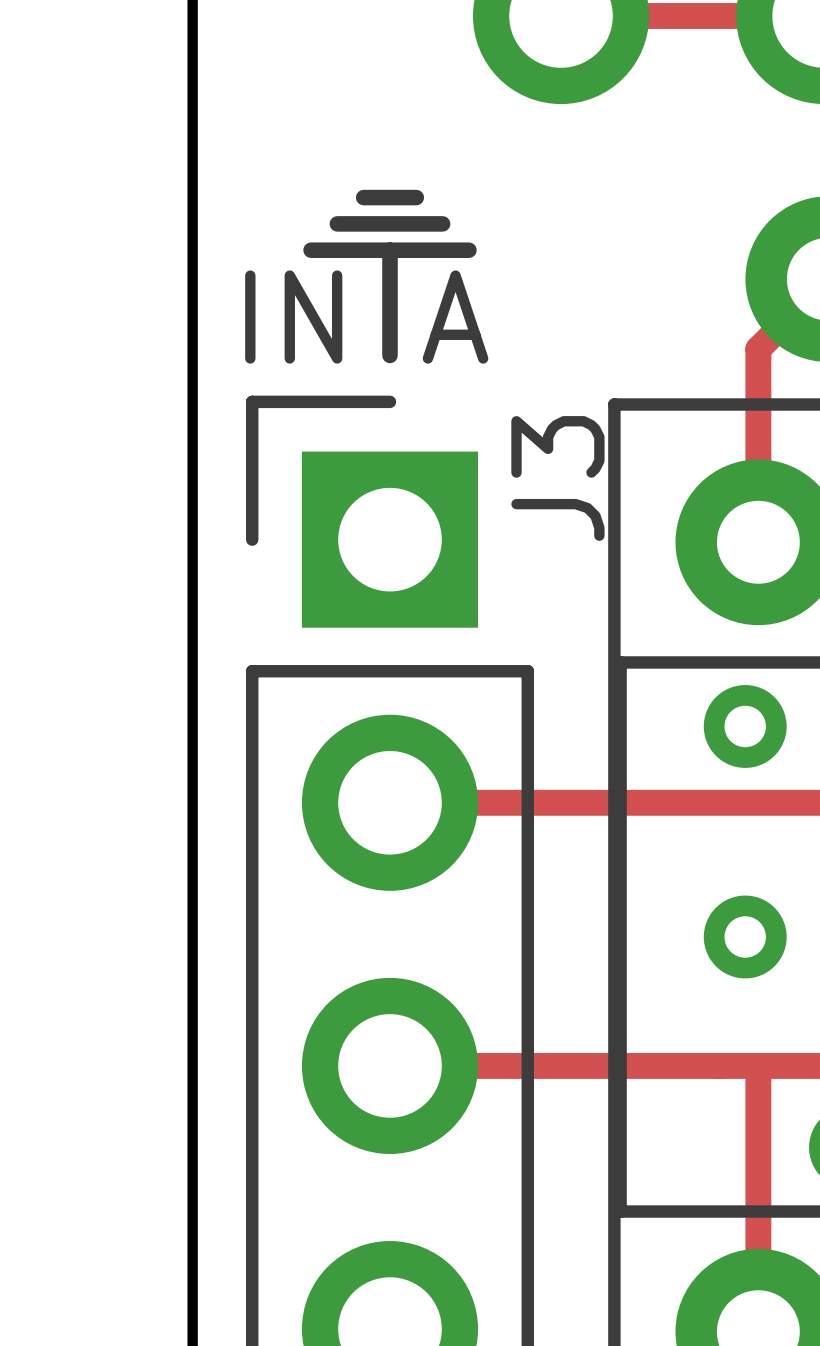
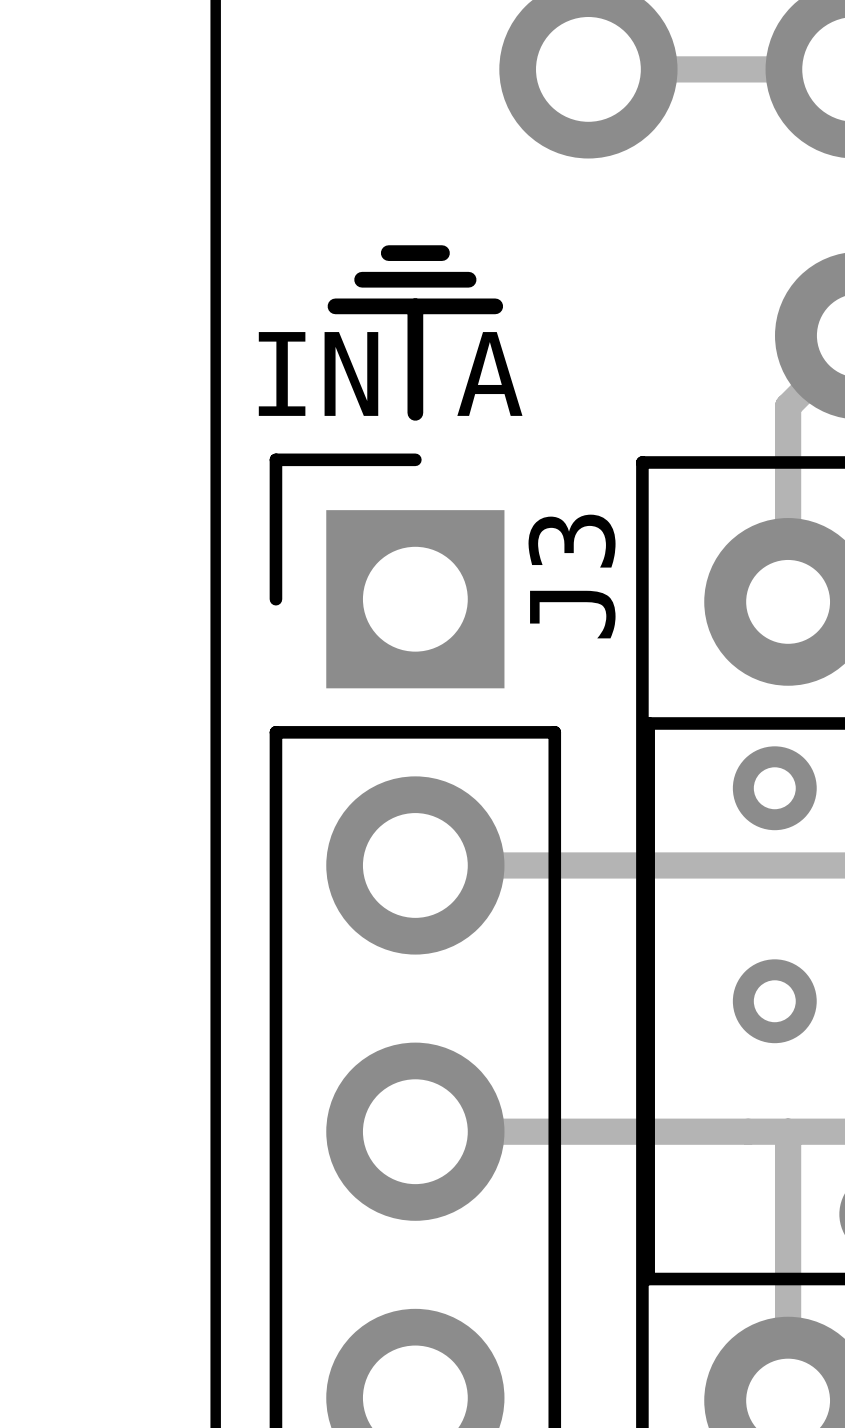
J3 name position: J3 (557, 478) -> J3 (572, 576)

